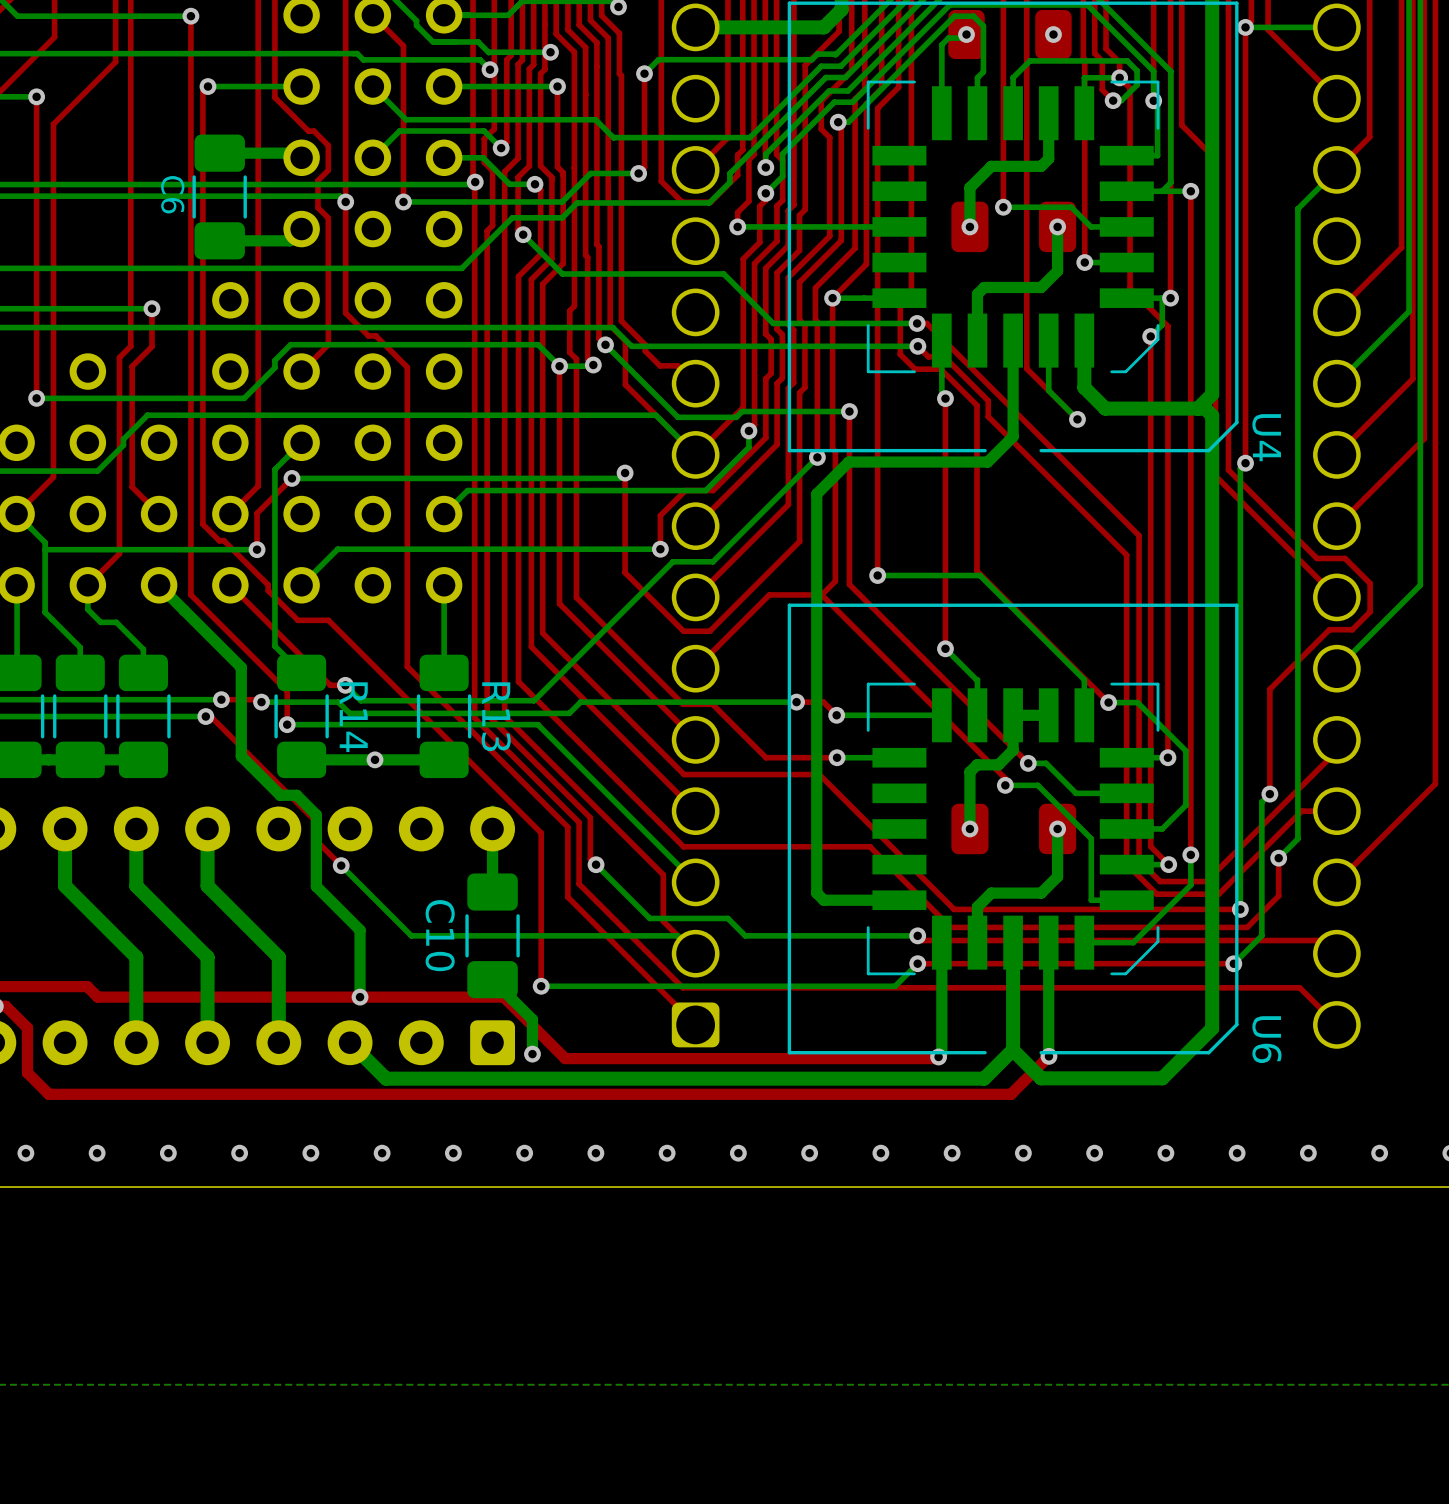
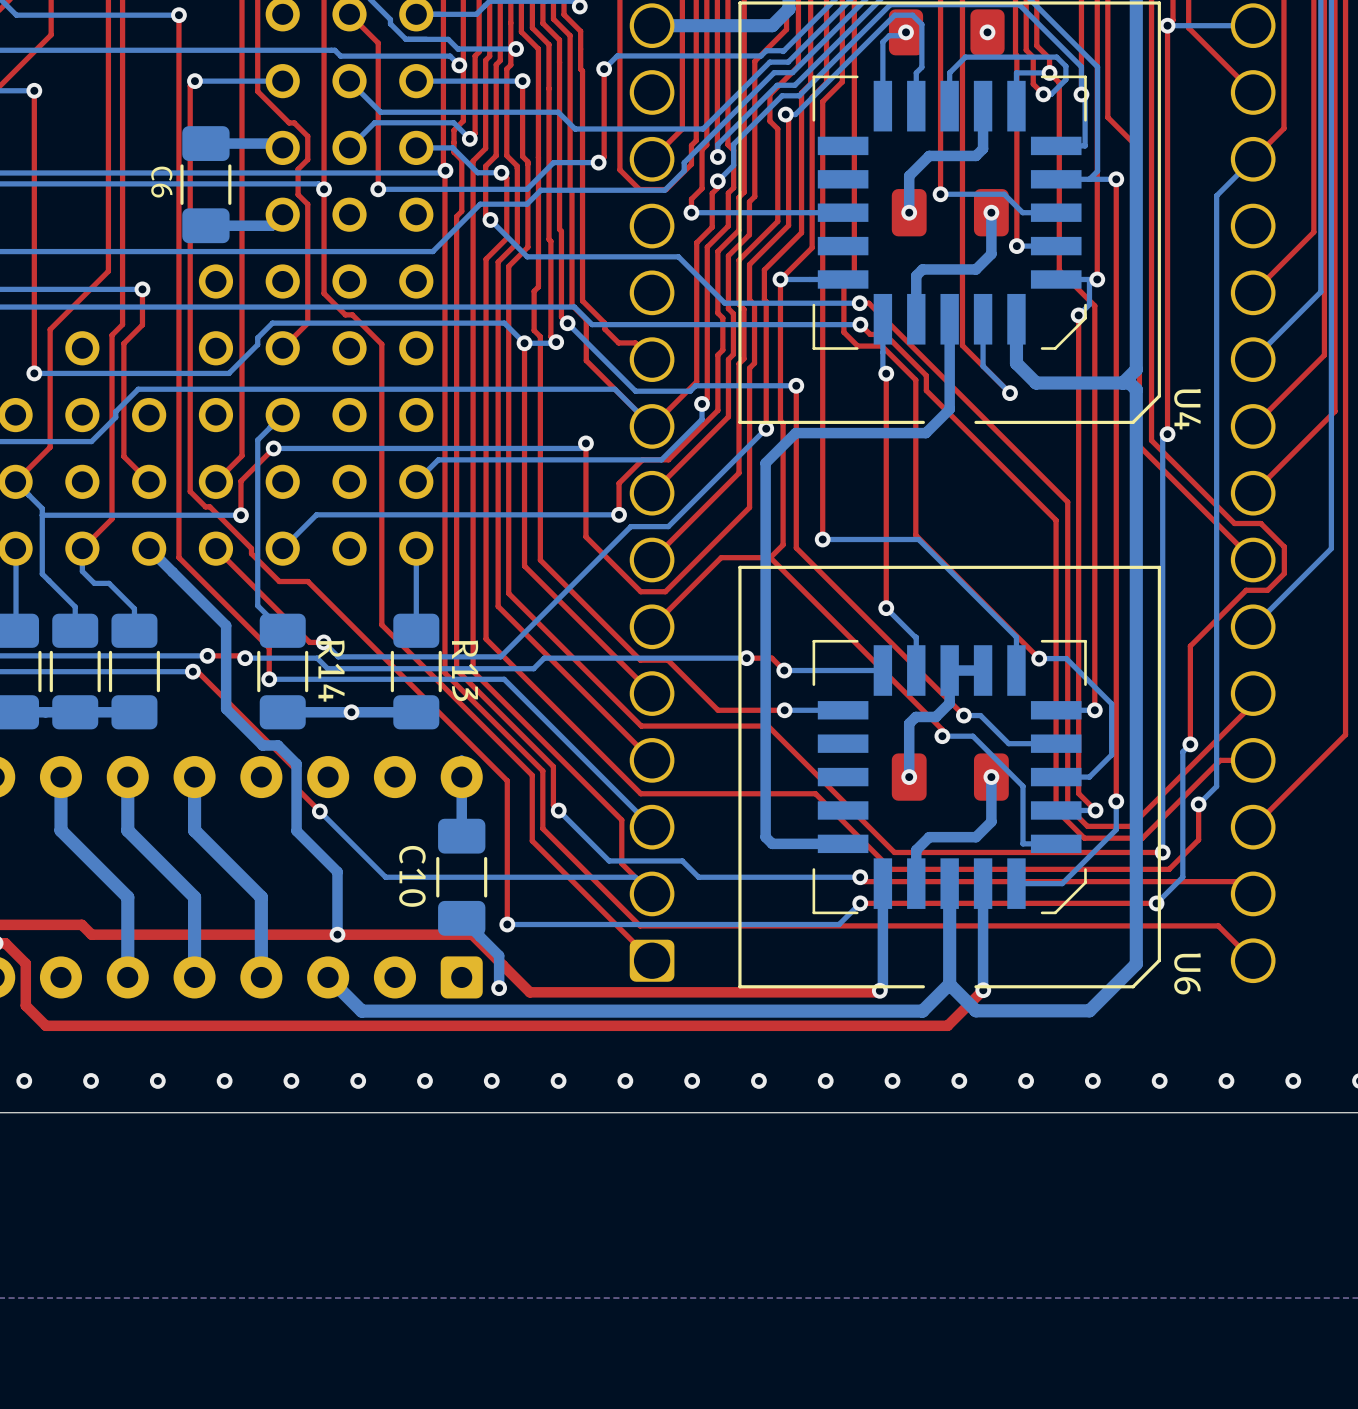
top track: (115, 61) (53, 124) (53, 351) -> (108, 58) (108, 271) (50, 329)

